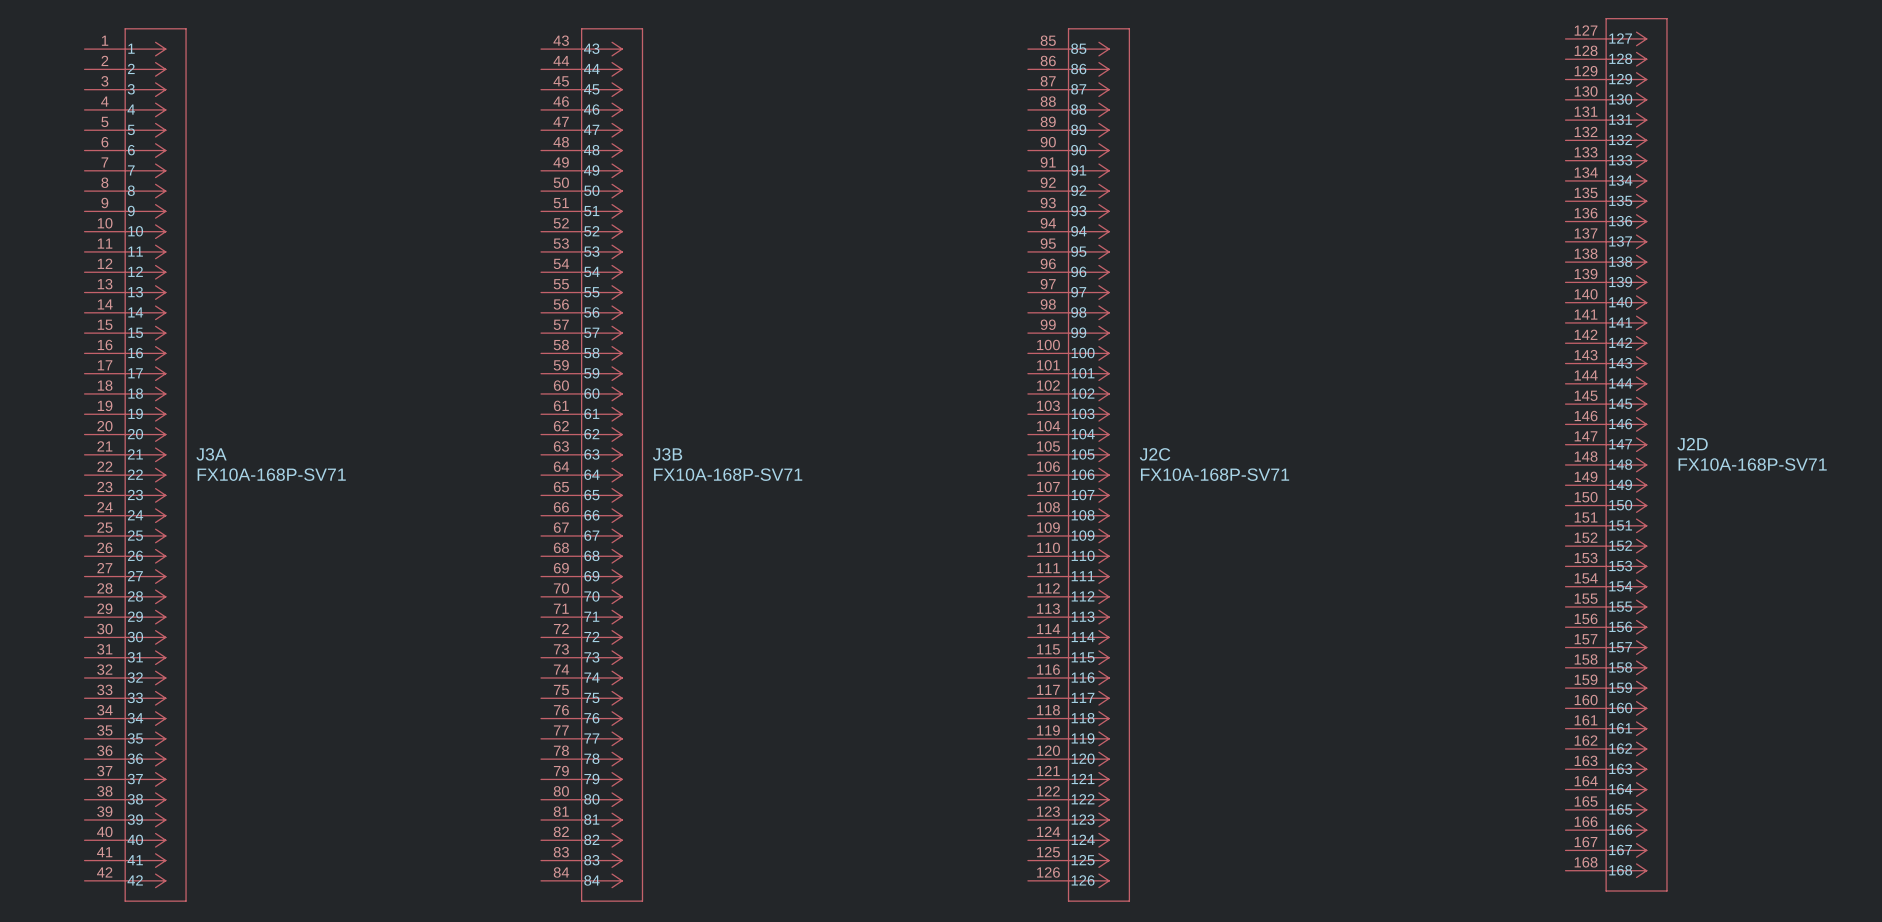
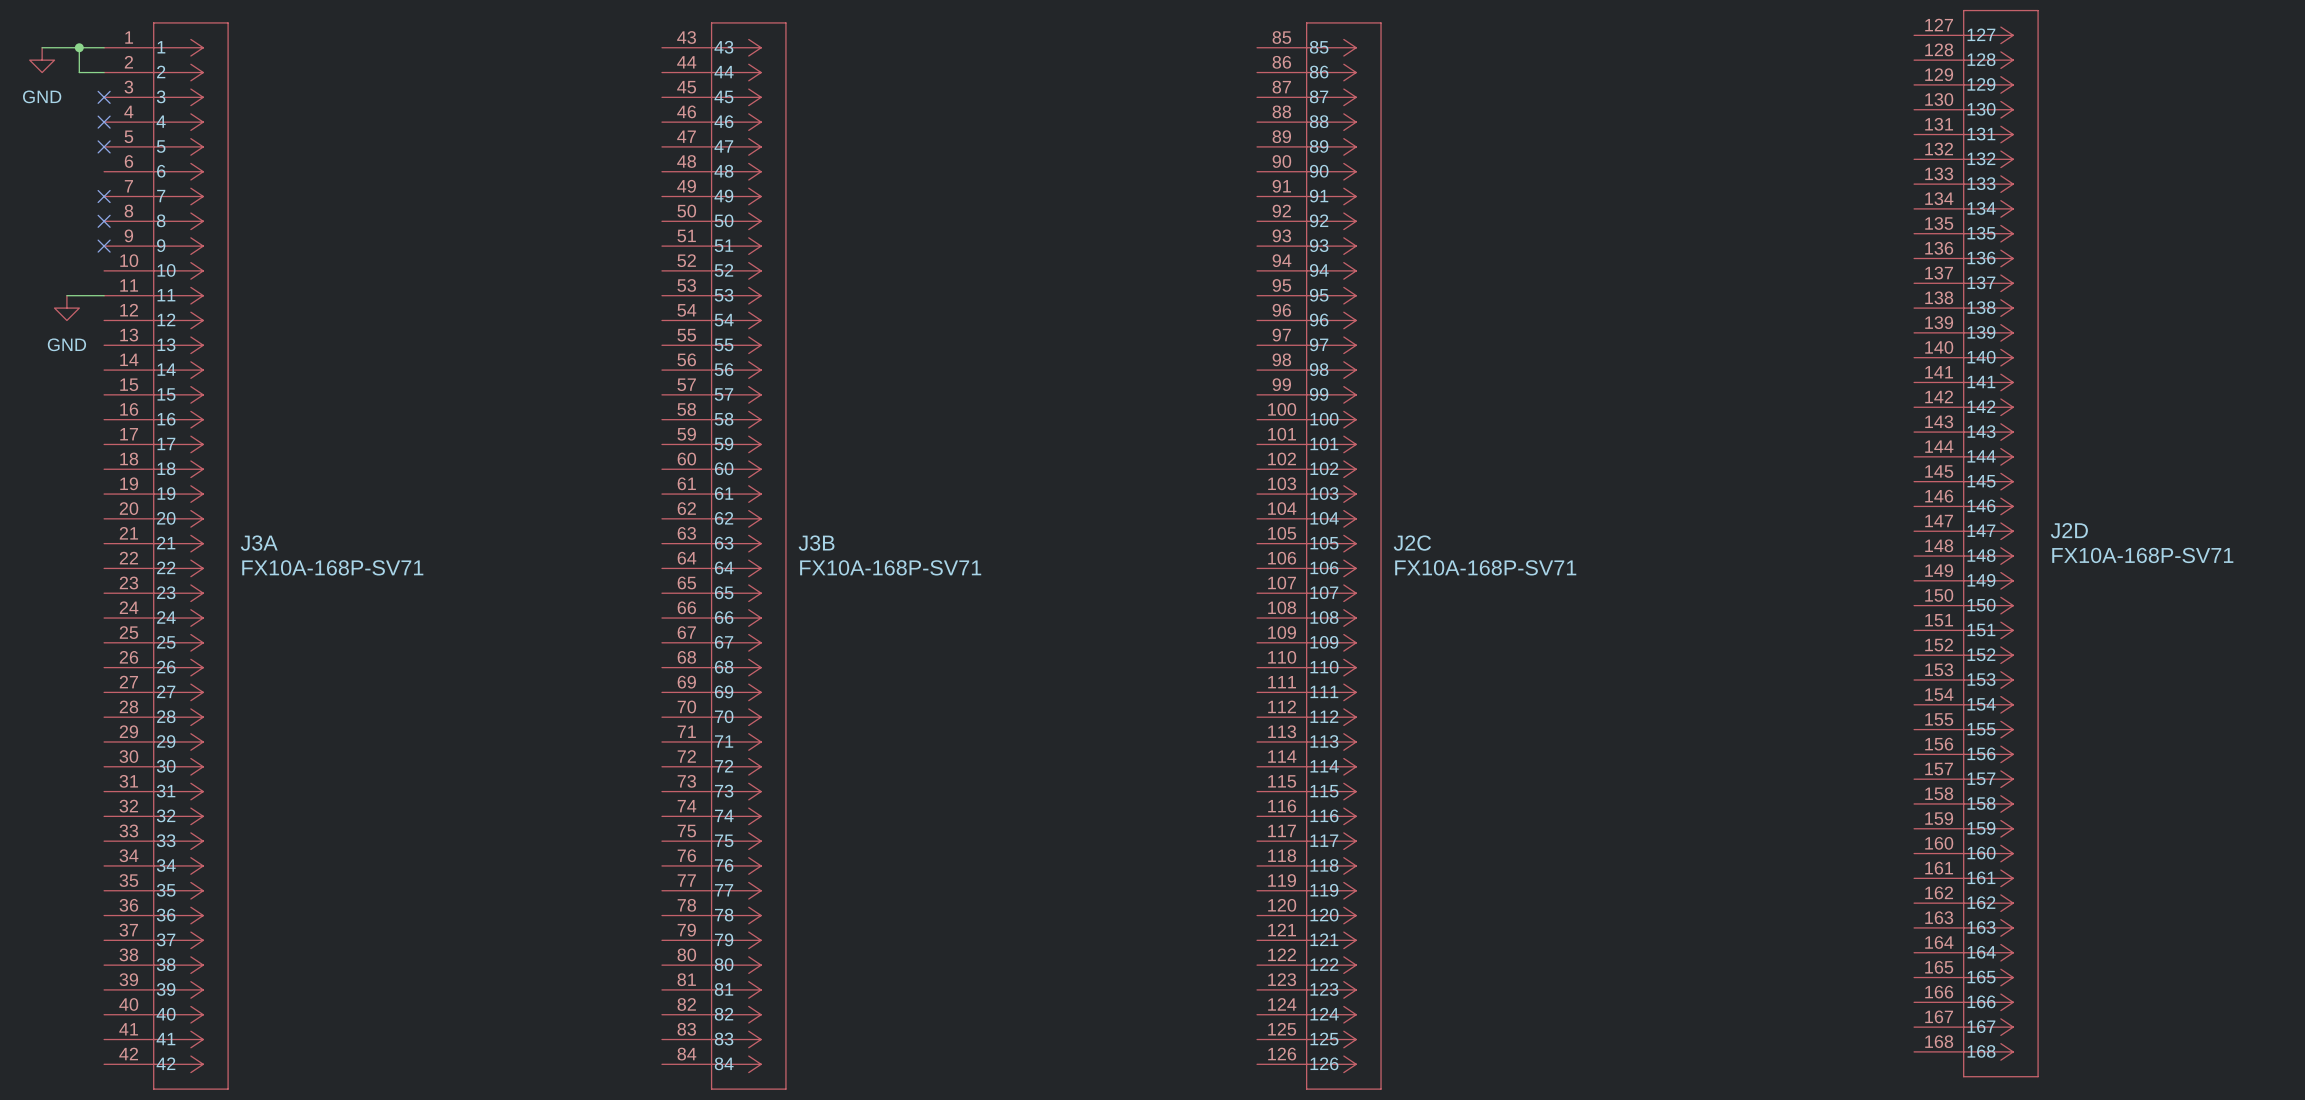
wire: none -> (42, 47) (104, 47)
wire: none -> (79, 47) (79, 72) (104, 72)
junction: none -> (79, 47)
power symbol: none -> GND (42, 60)
no-connect mark: none -> (104, 97)
no-connect mark: none -> (104, 122)
no-connect mark: none -> (104, 146)
no-connect mark: none -> (104, 196)
no-connect mark: none -> (104, 221)
no-connect mark: none -> (104, 246)
wire: none -> (66, 295) (104, 295)
power symbol: none -> GND (66, 308)

